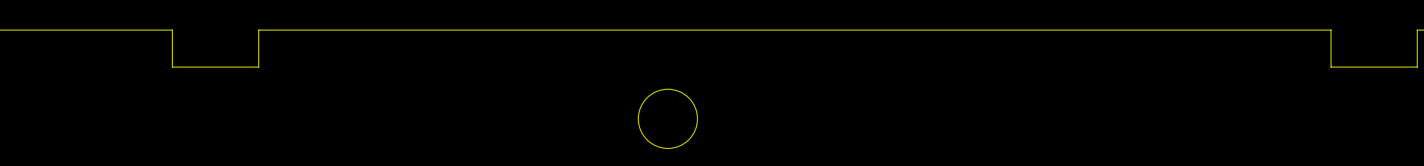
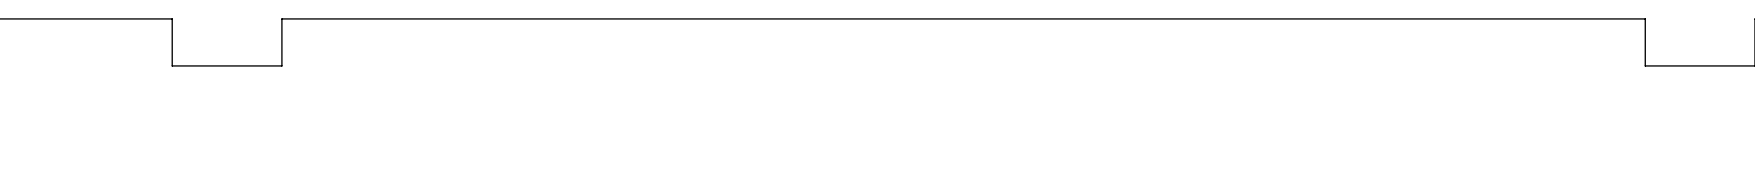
round board edge: [638, 88, 698, 149] -> none

